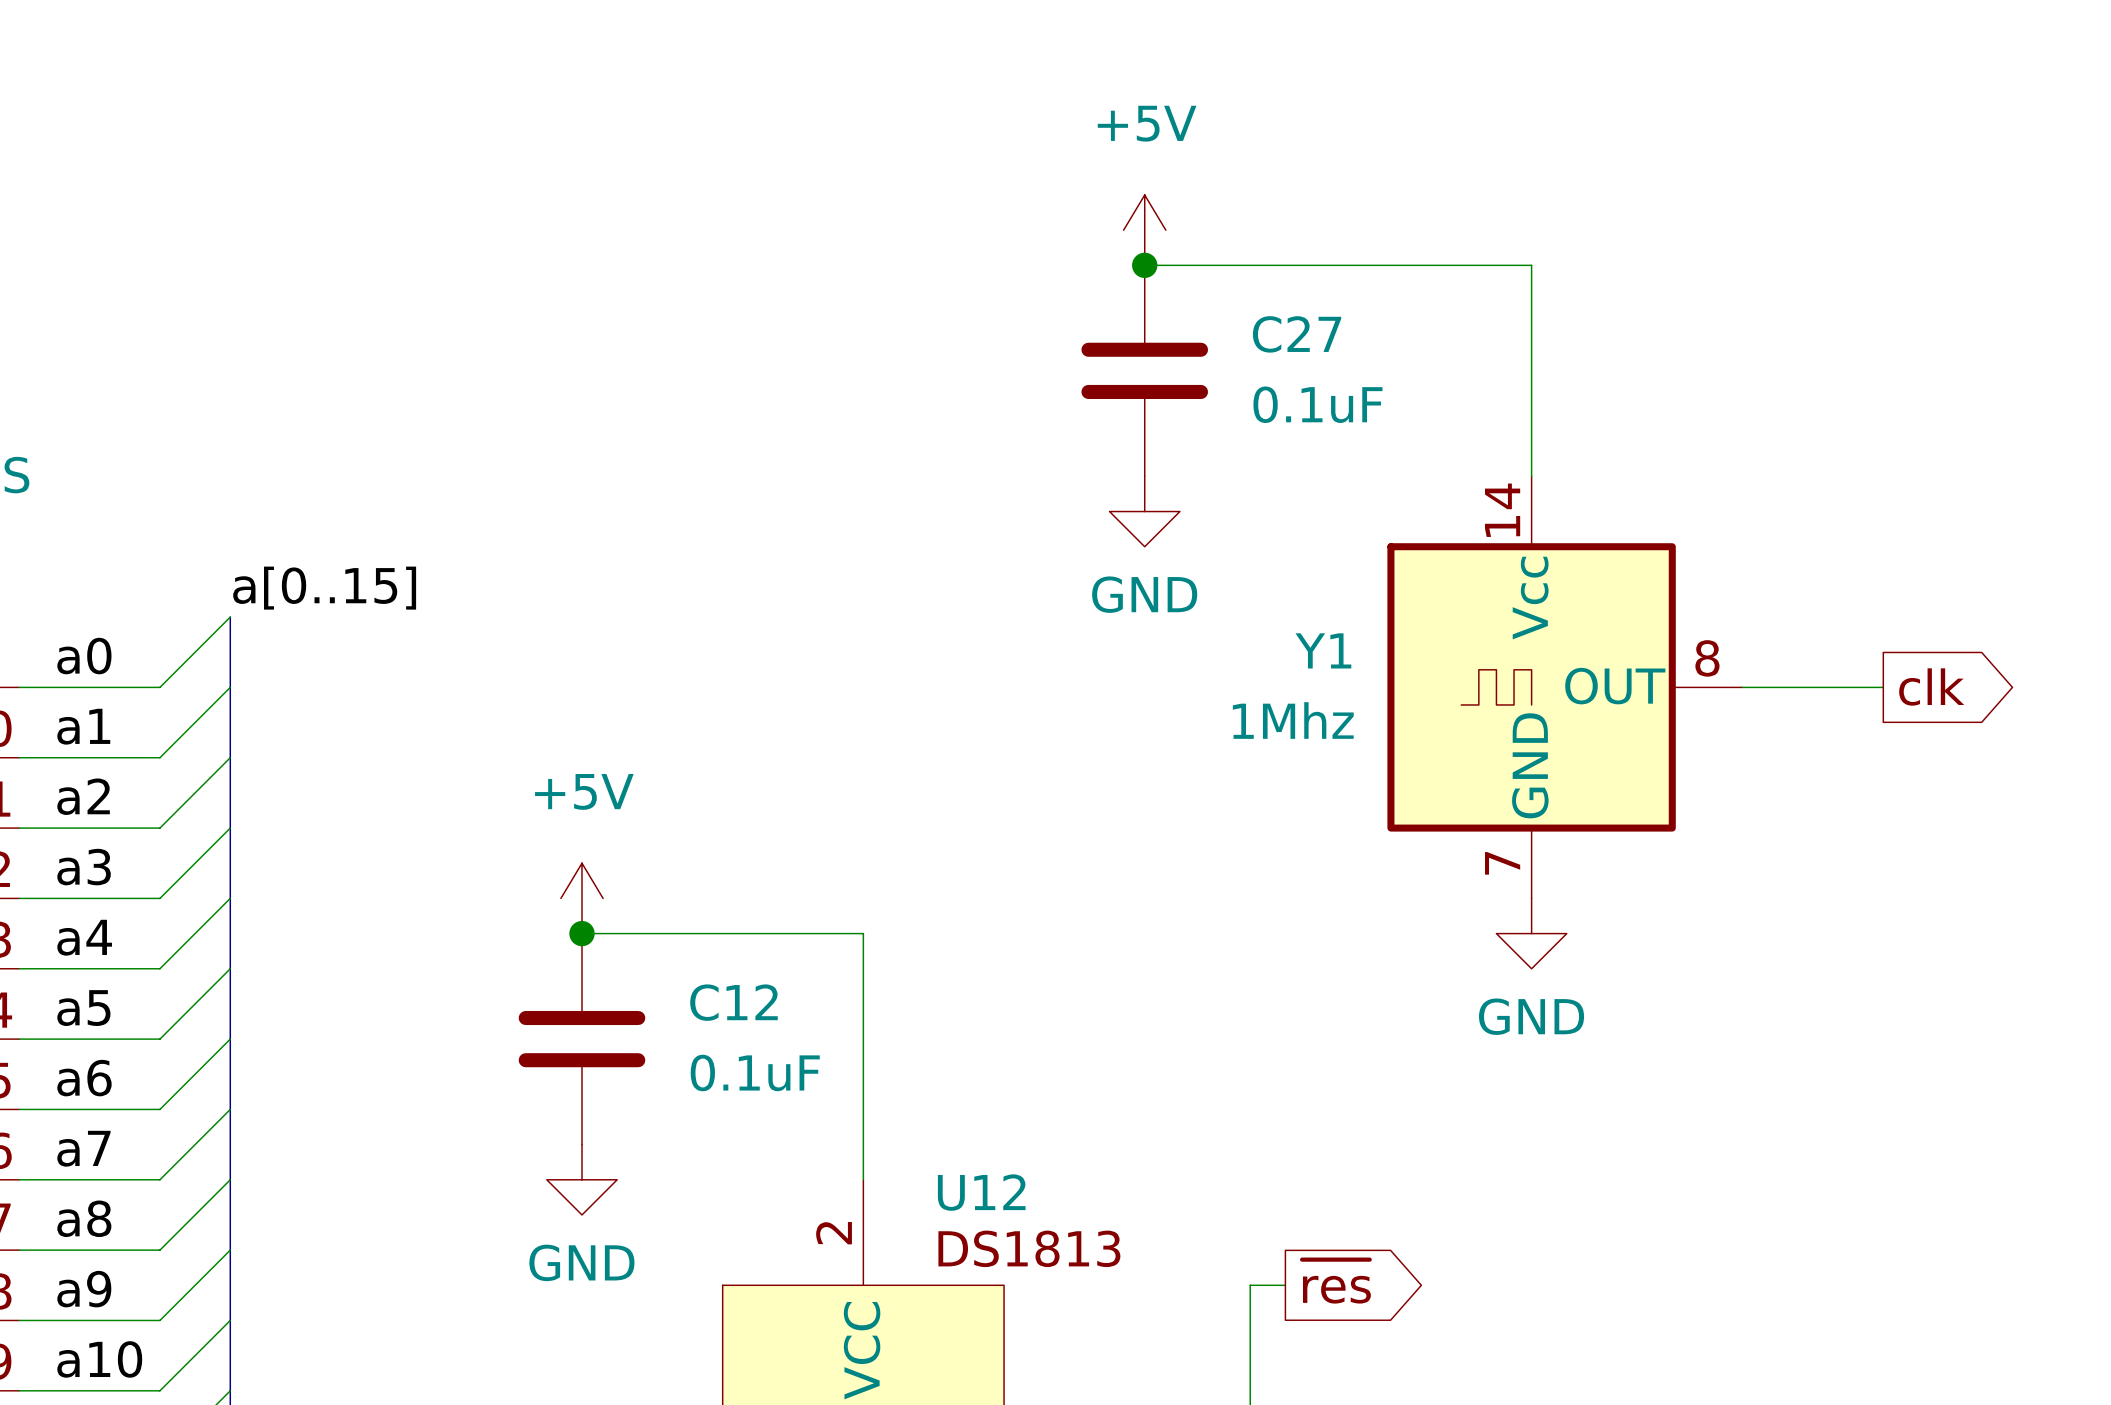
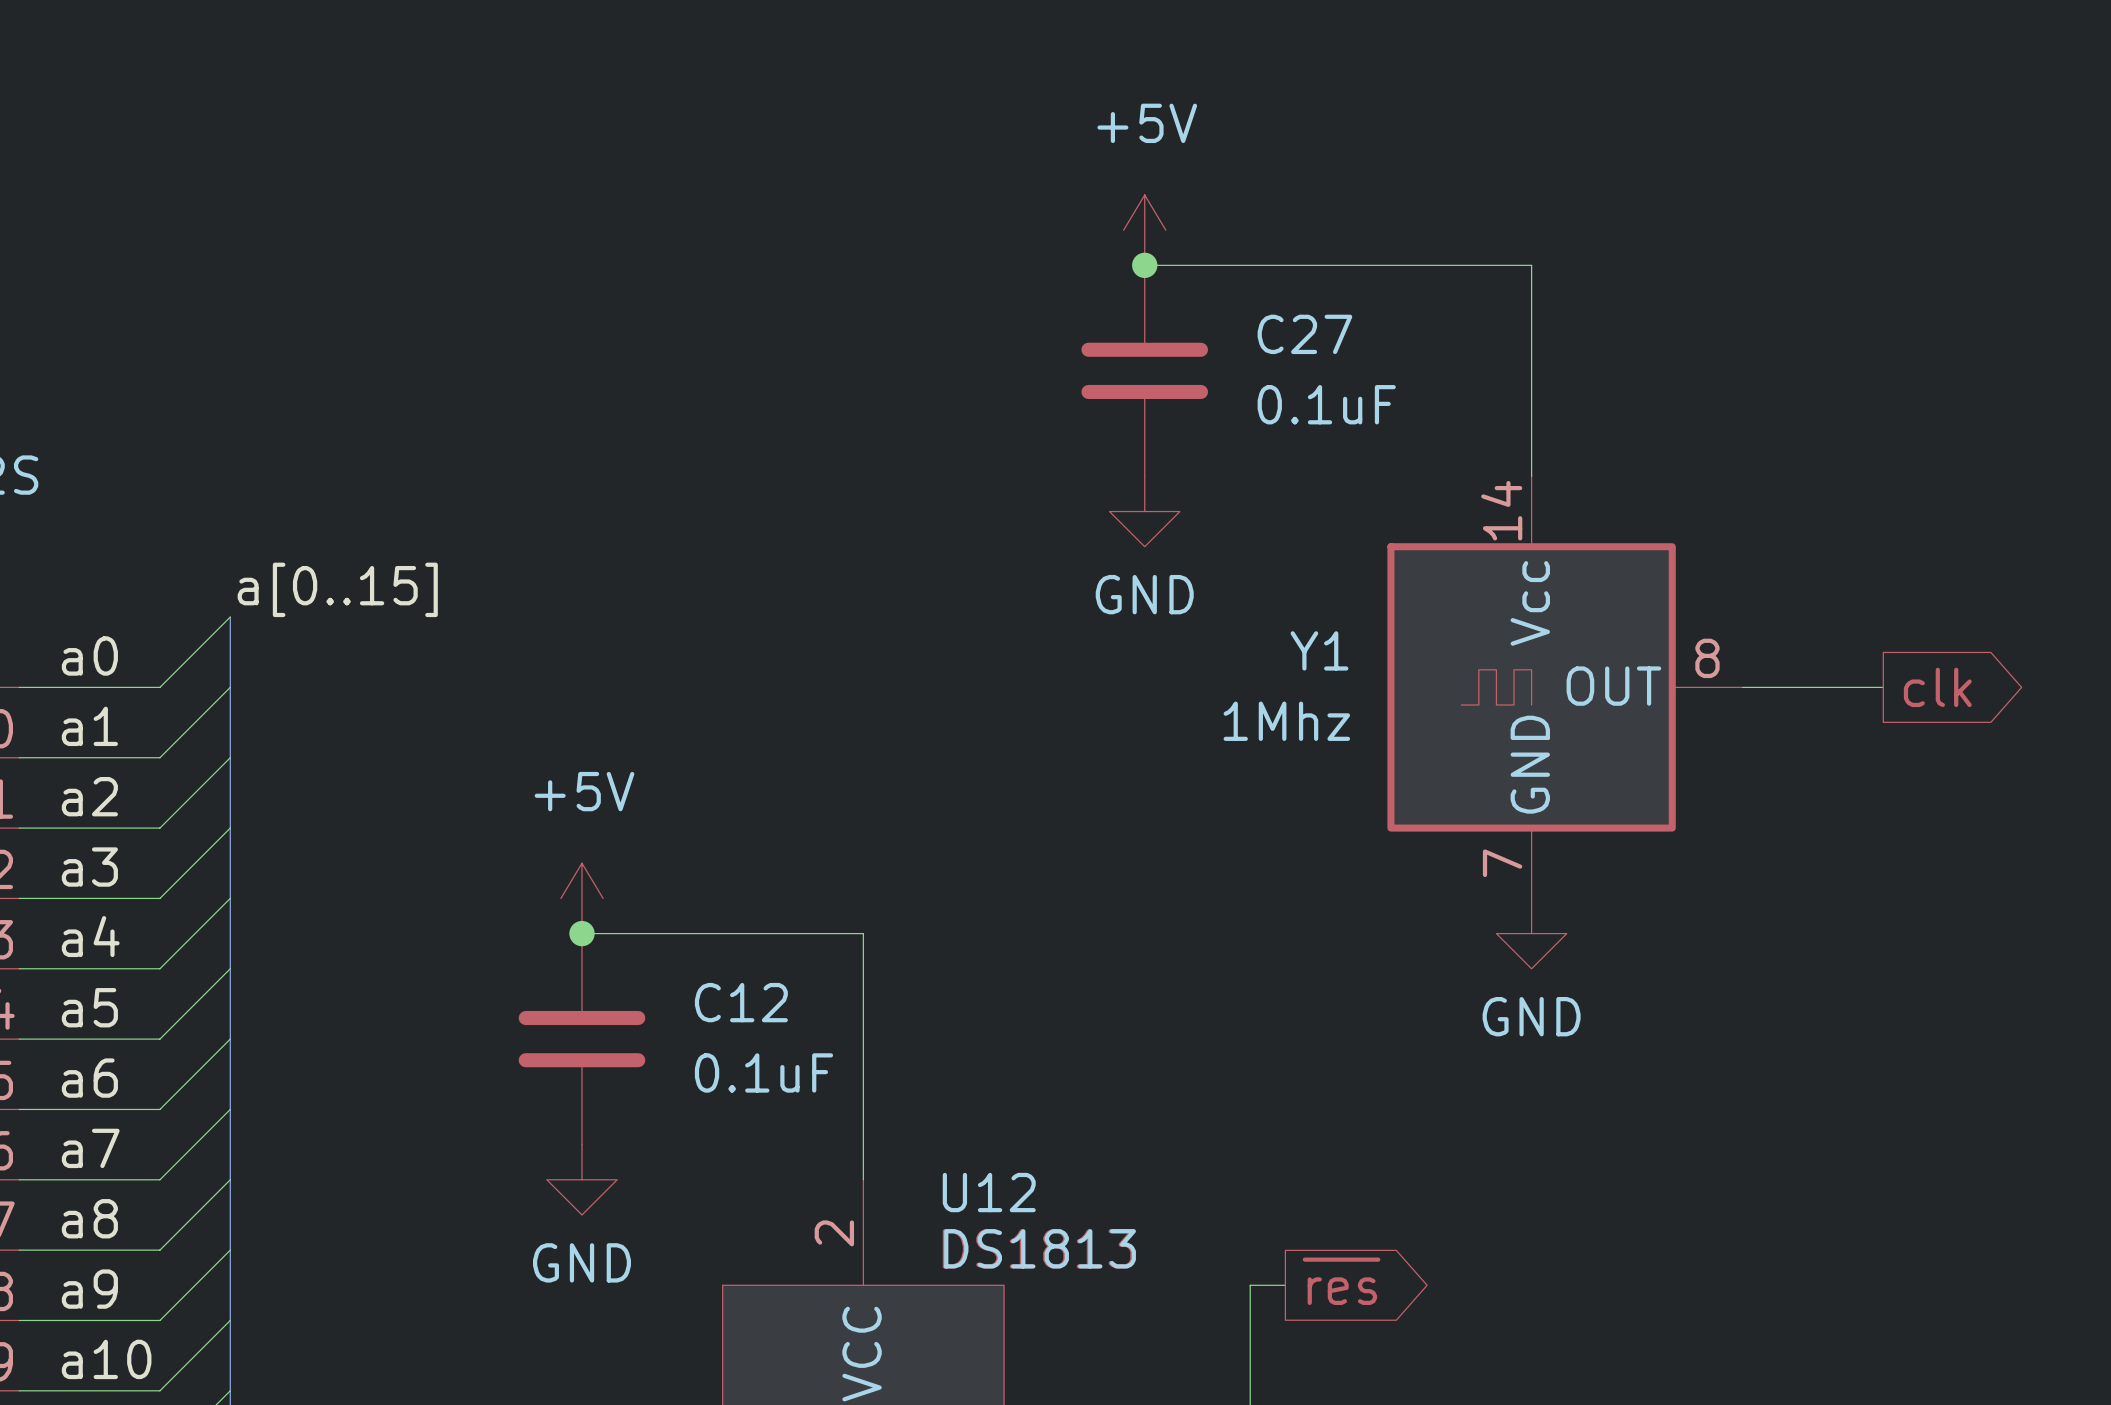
U12 value: none -> DS1813 (1040, 1248)

